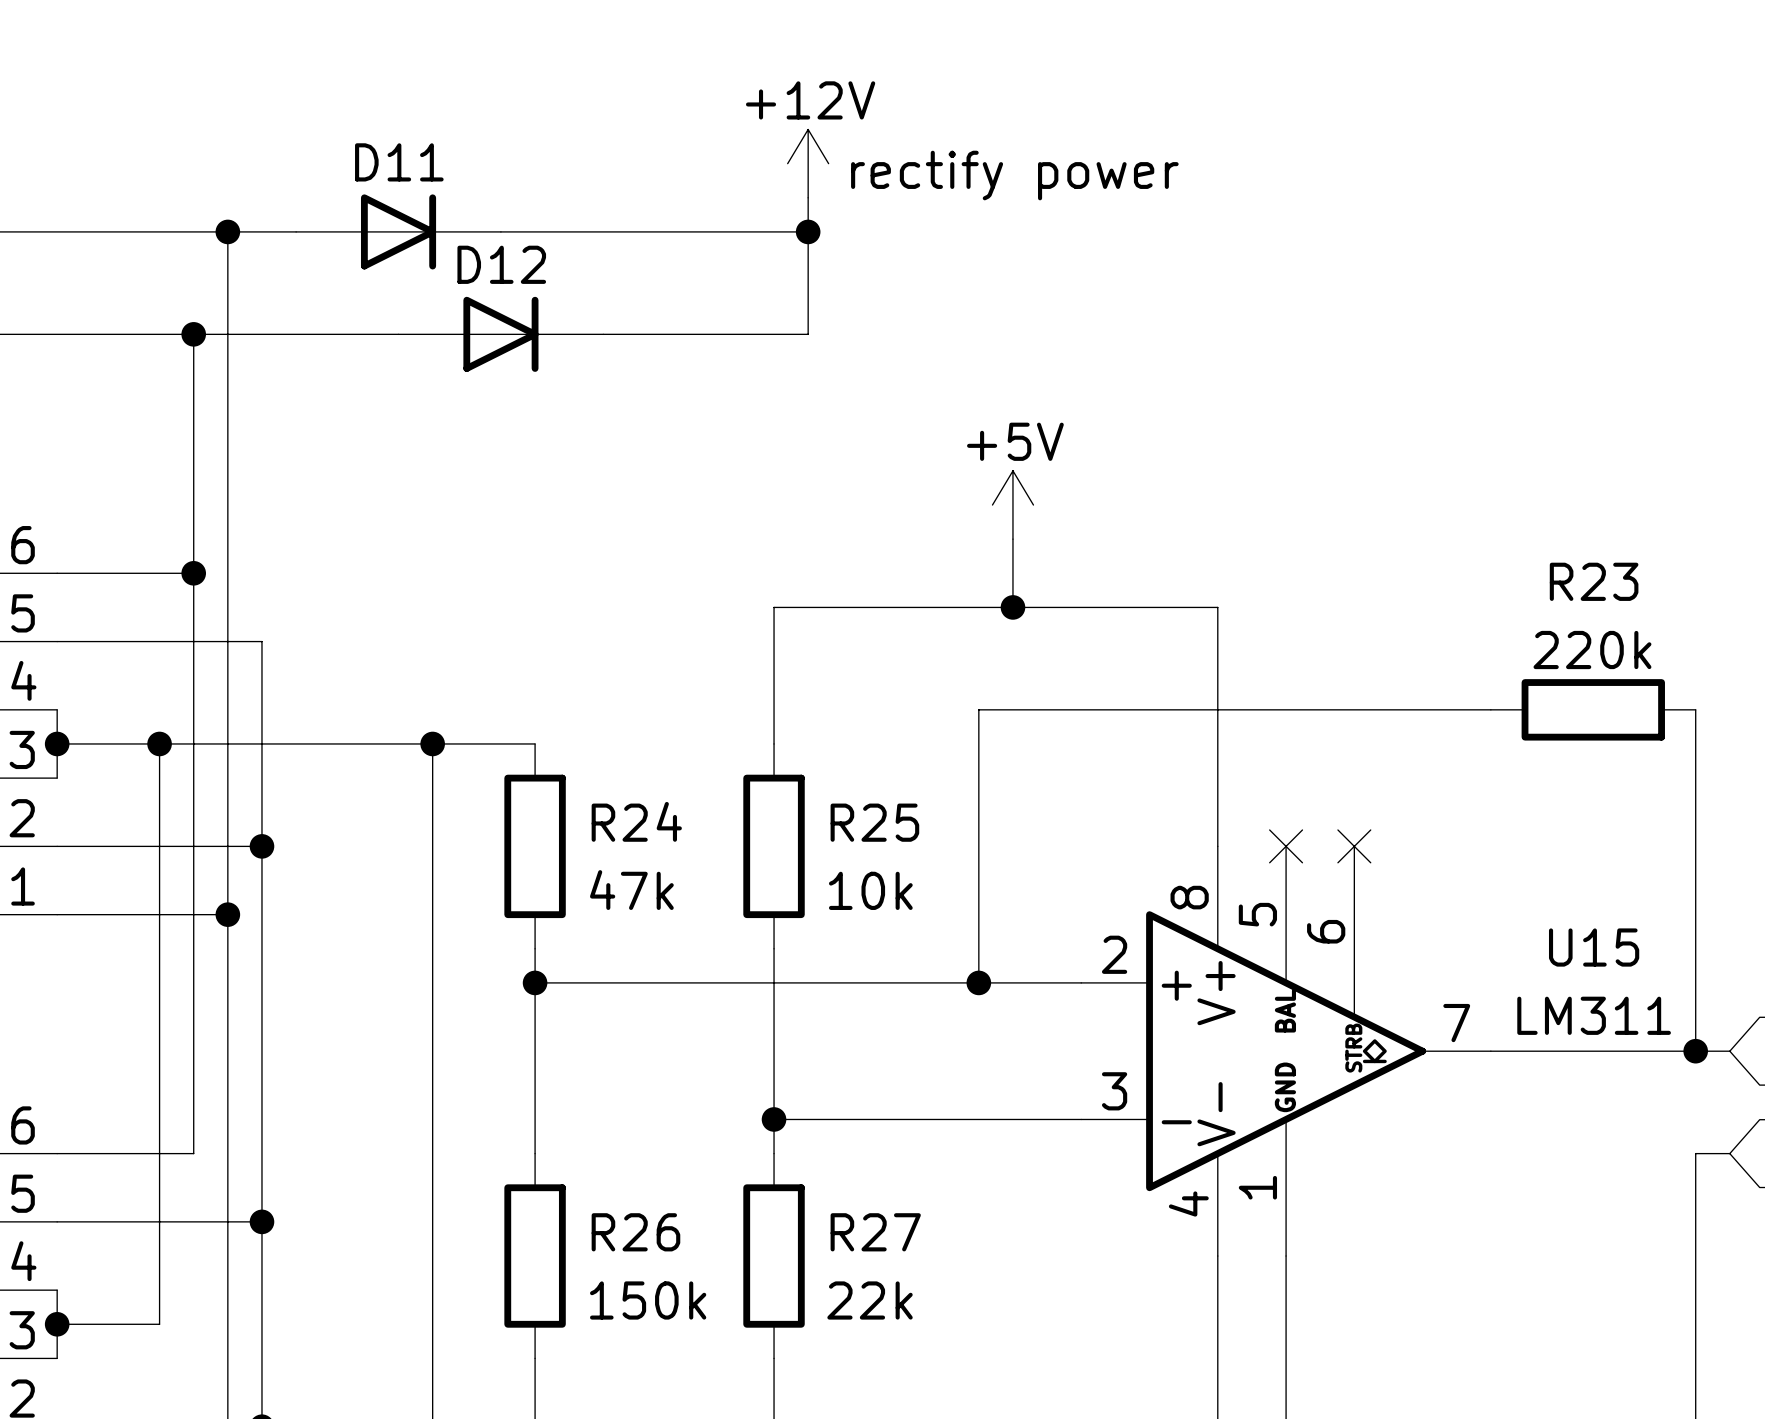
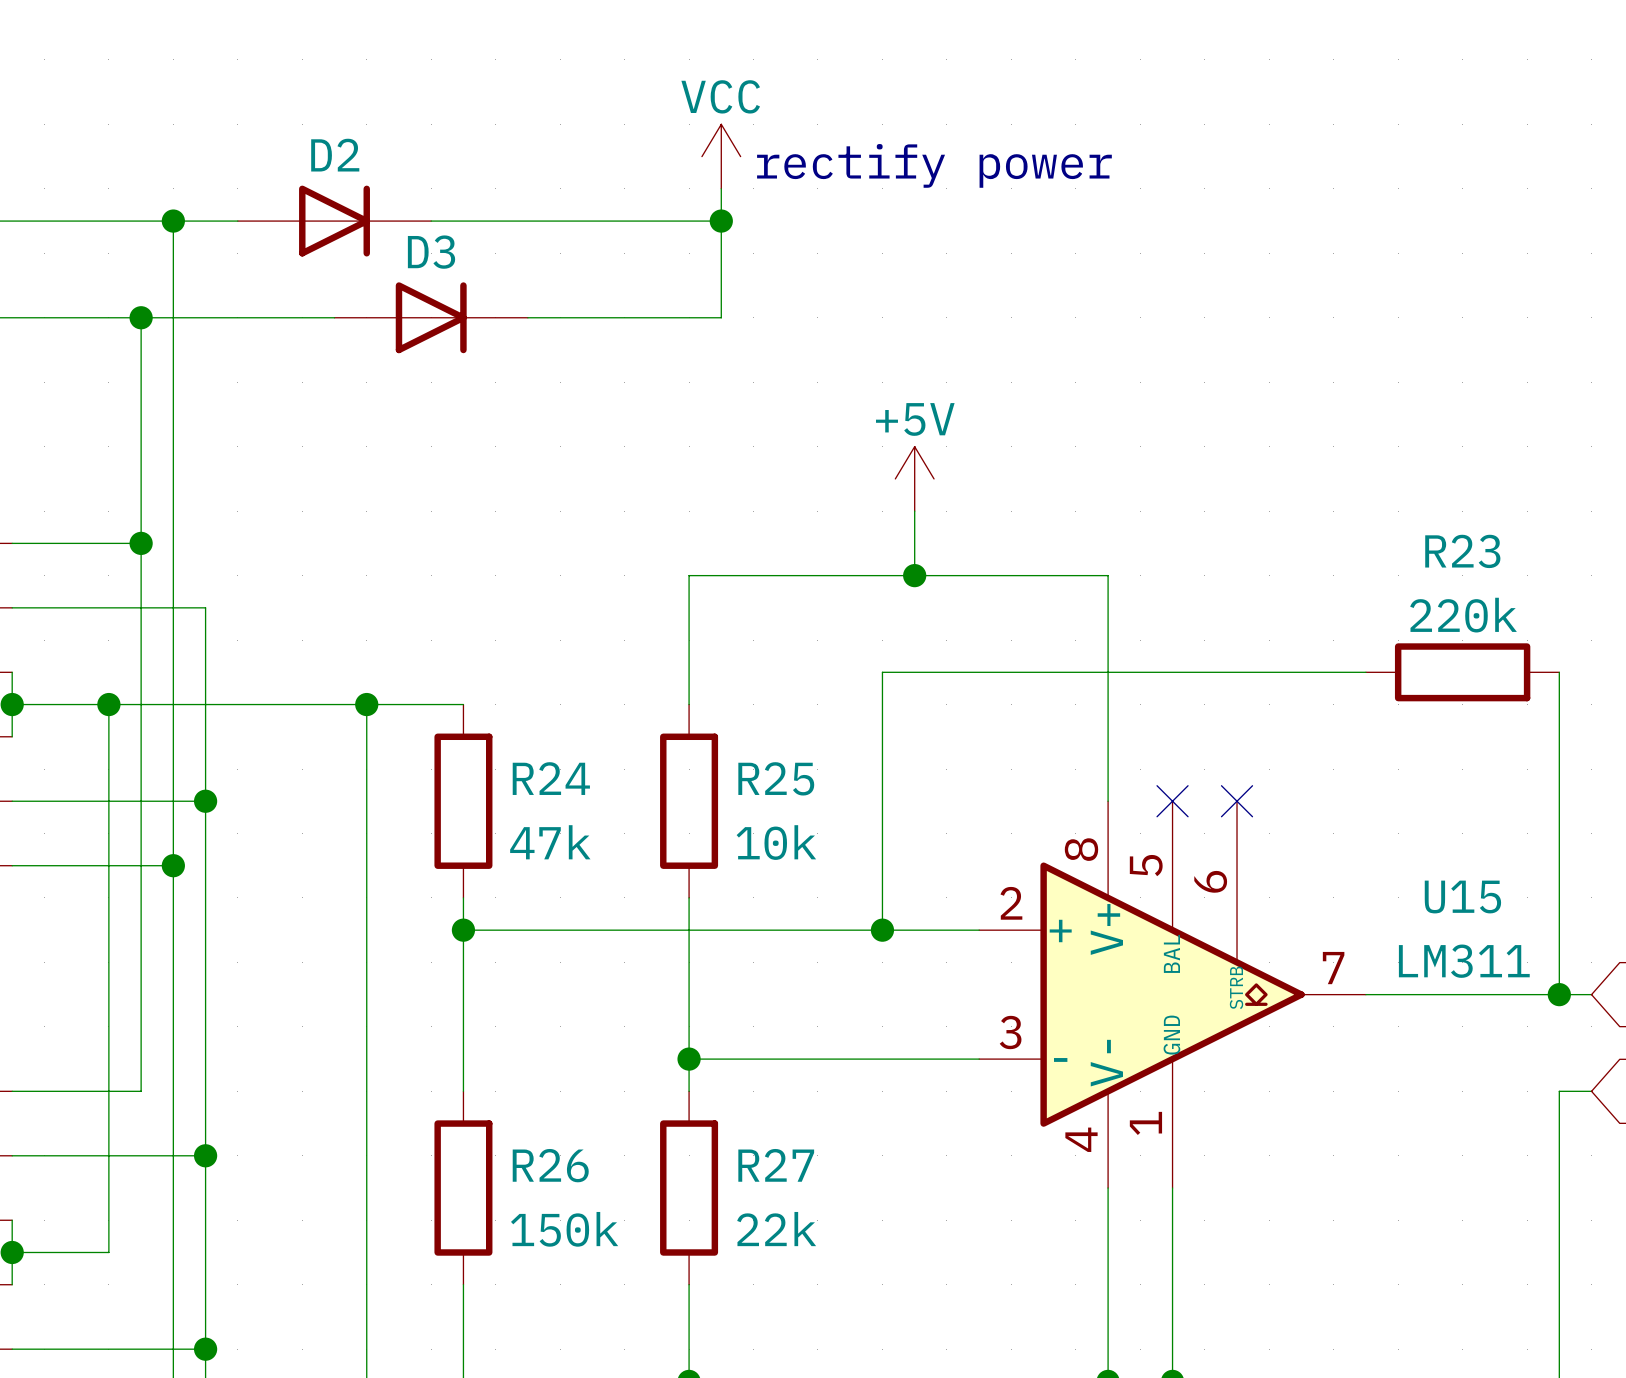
D11 name: D11 (399, 162) -> D2 (335, 155)
power symbol: +12V (808, 163) -> VCC (721, 156)
D12 name: D12 (501, 264) -> D3 (431, 252)

